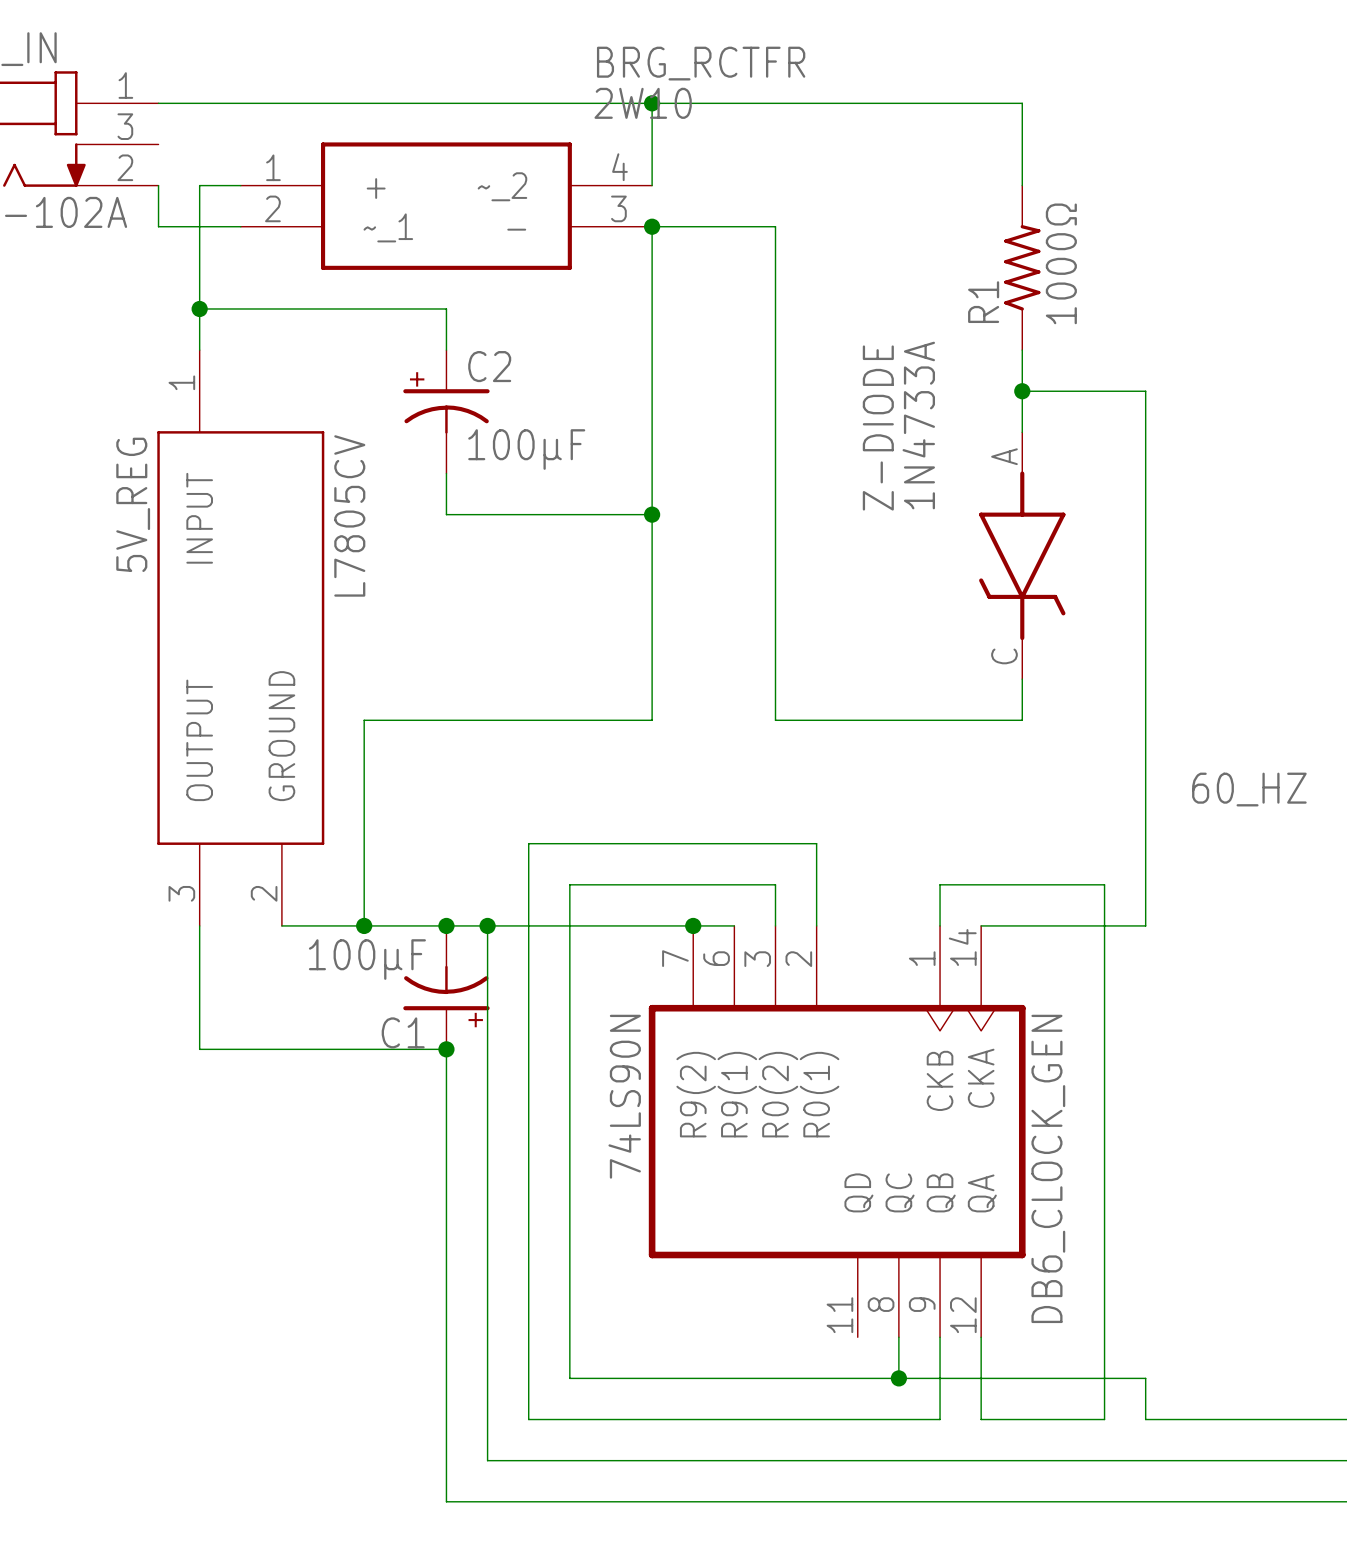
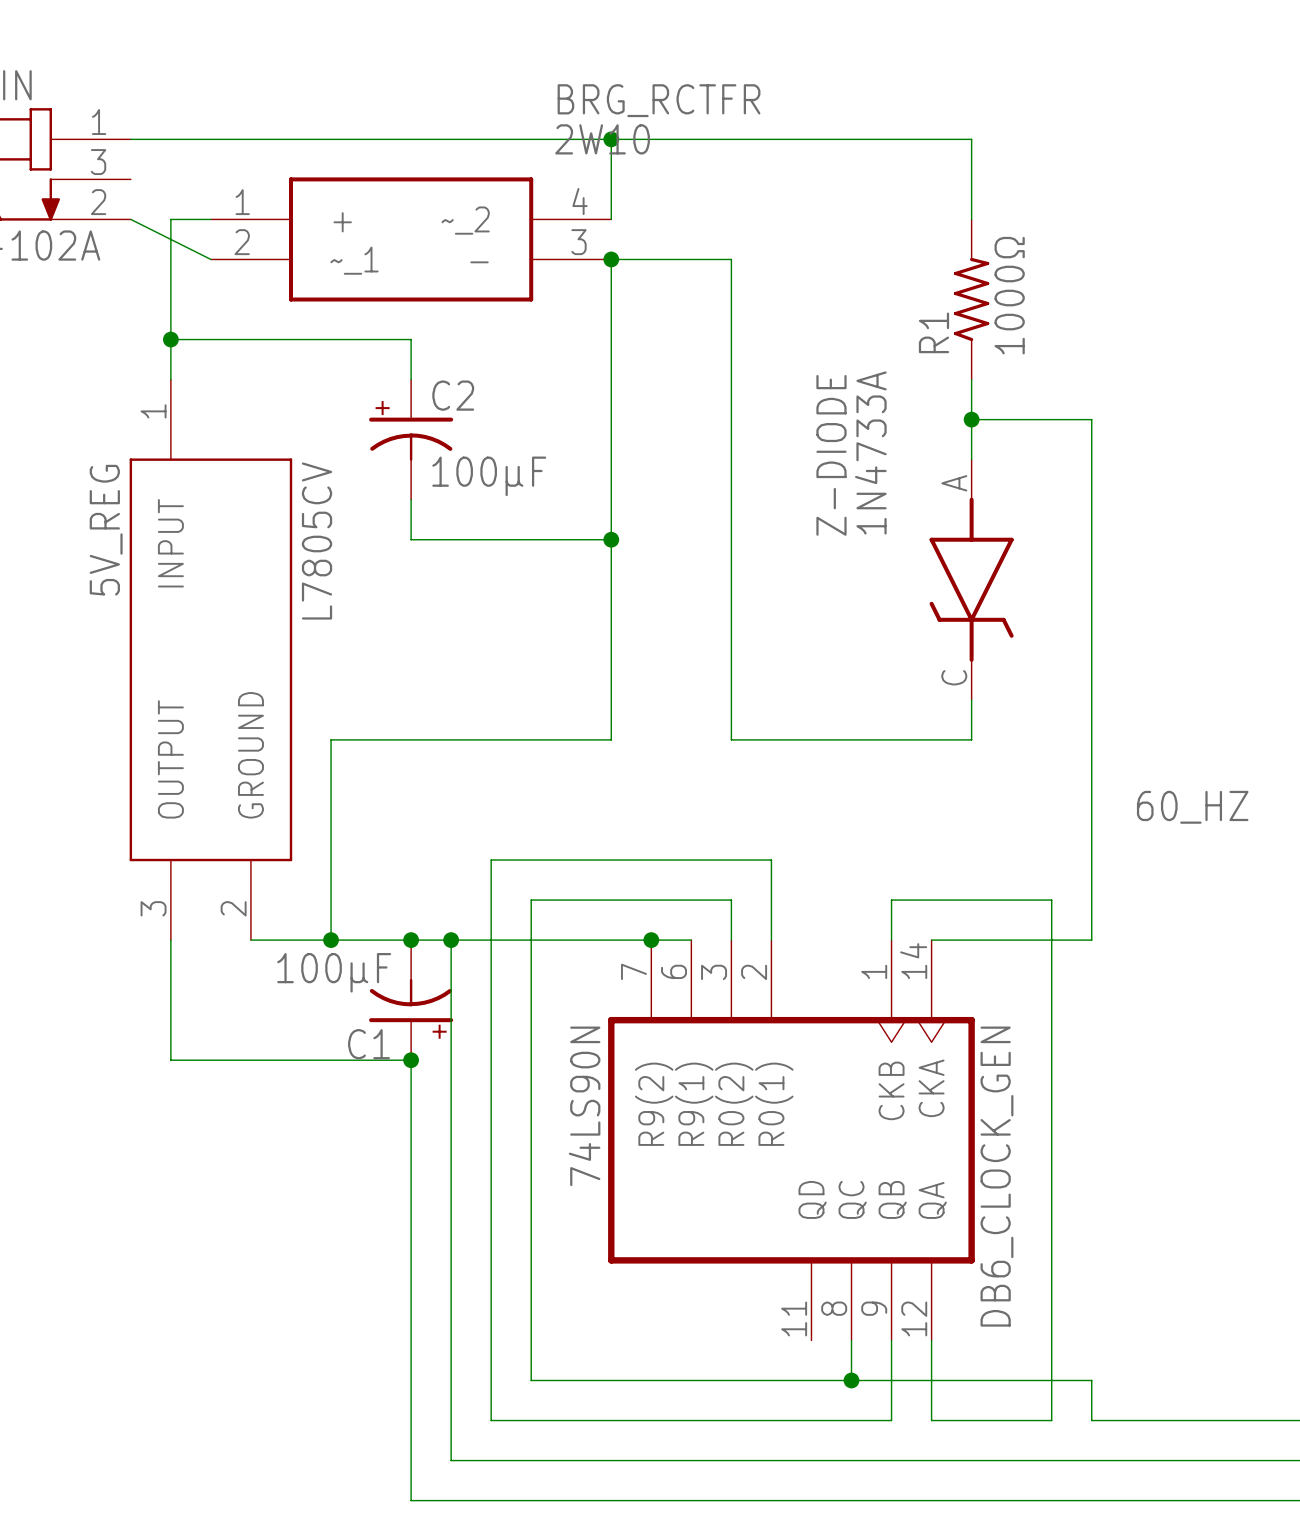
wire: (158, 185) (158, 226) (240, 226) -> (130, 219) (210, 259)

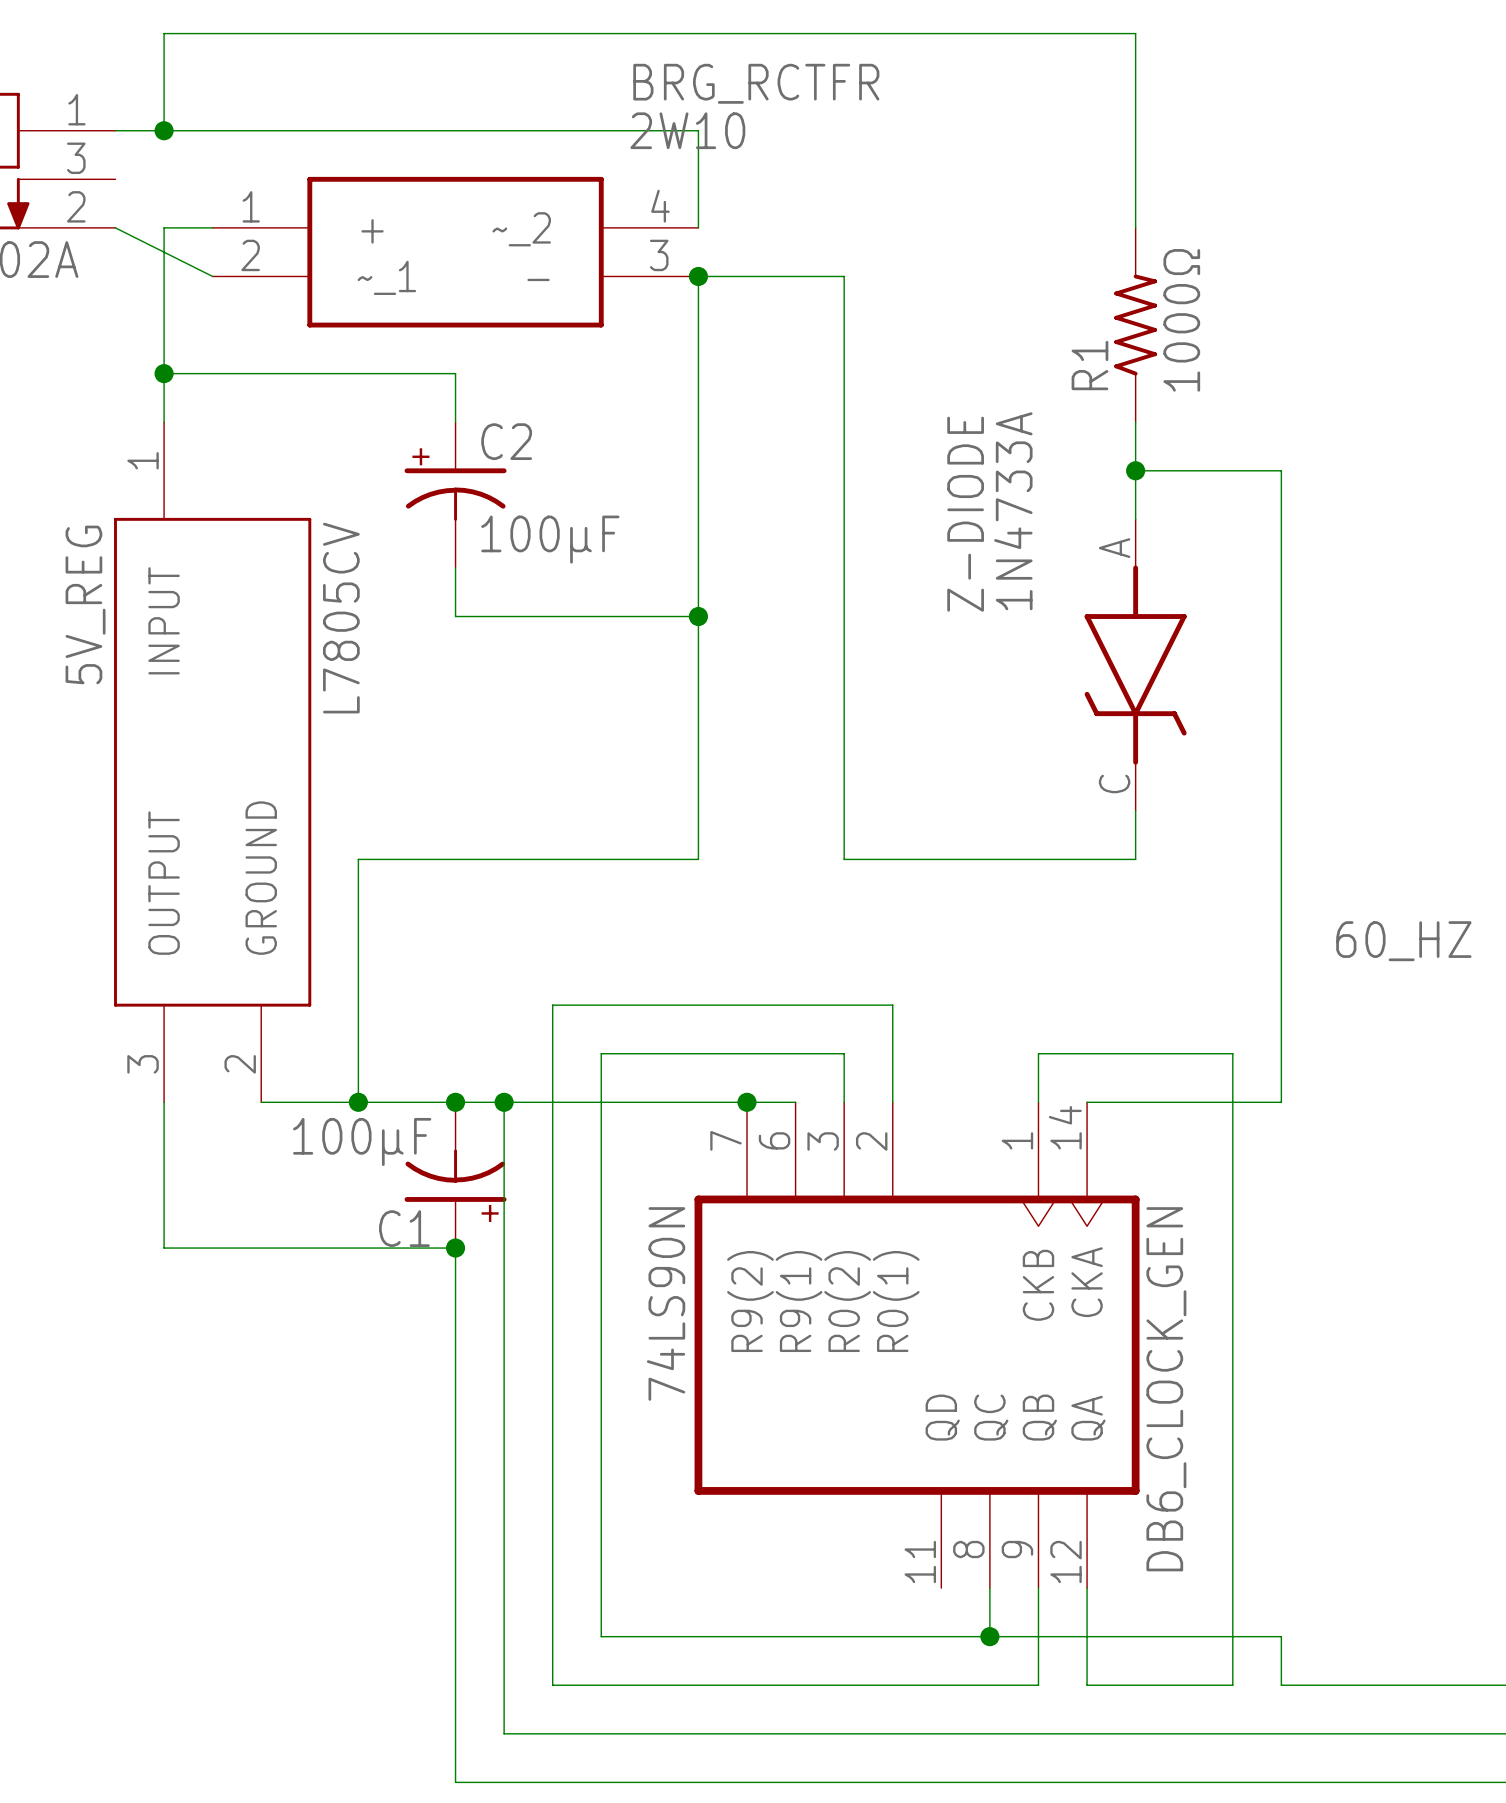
junction: none -> (164, 130)
wire: (611, 139) (971, 139) -> (164, 130) (164, 33) (1135, 33) (1135, 130)
junction: (611, 139) -> none

